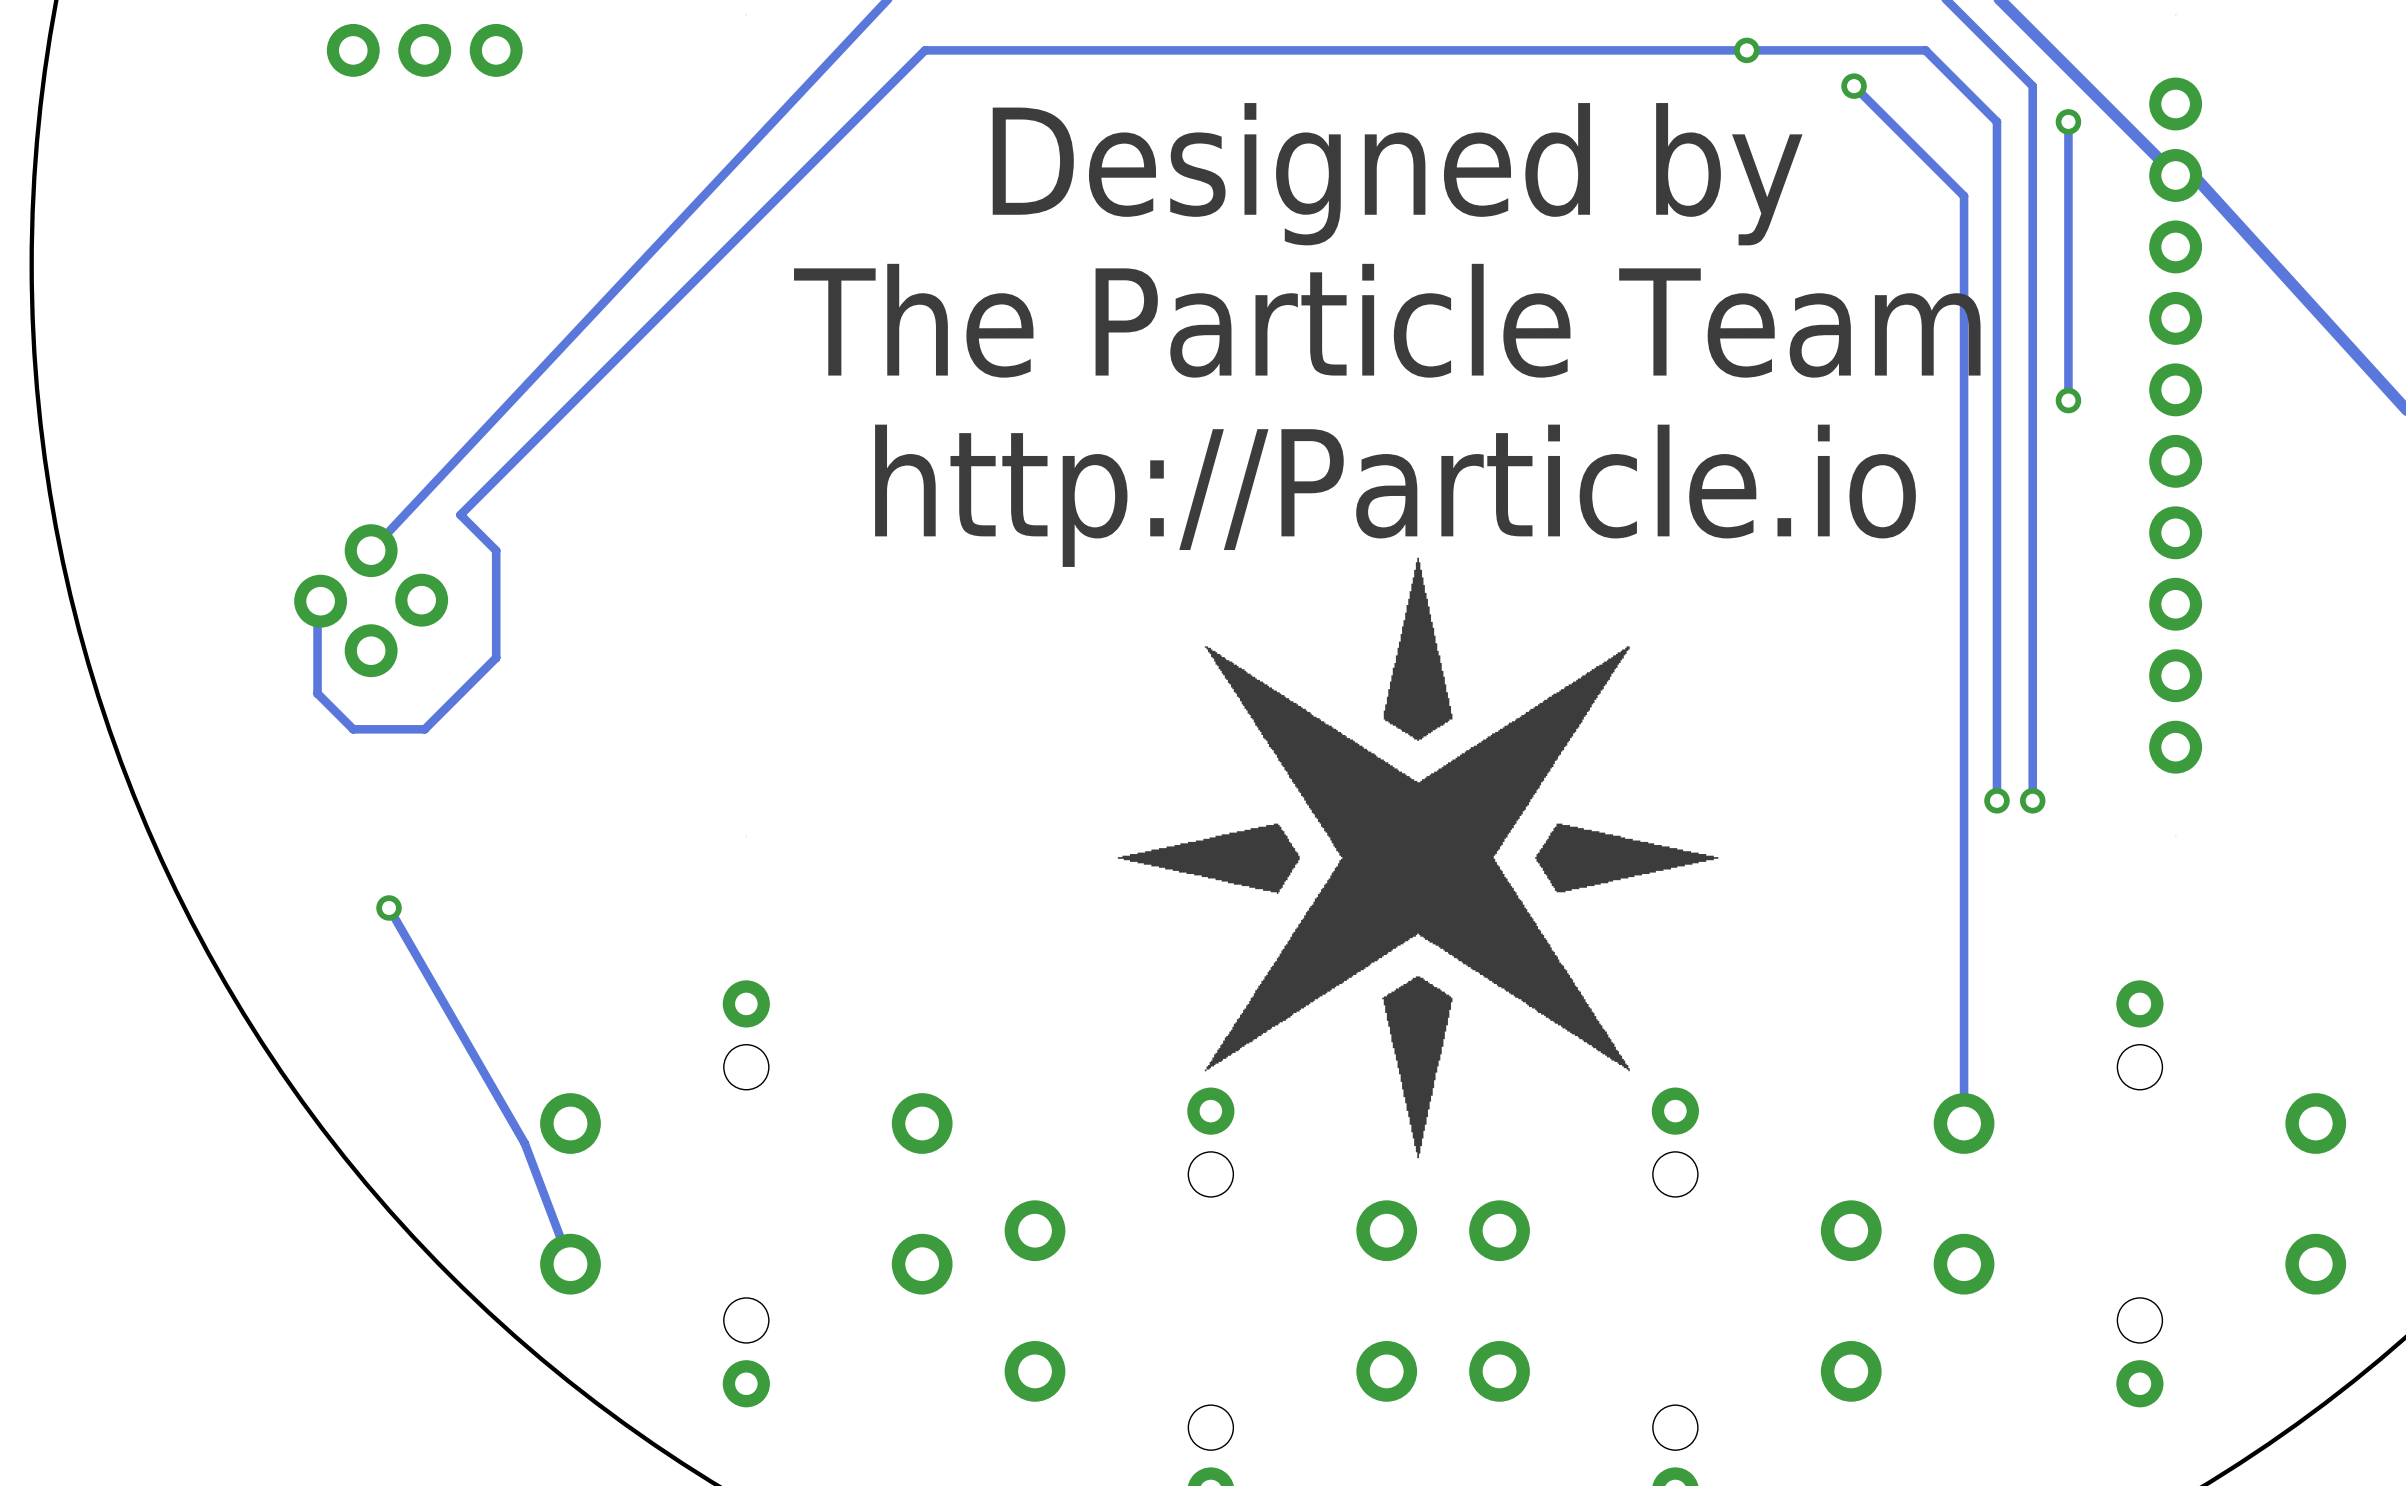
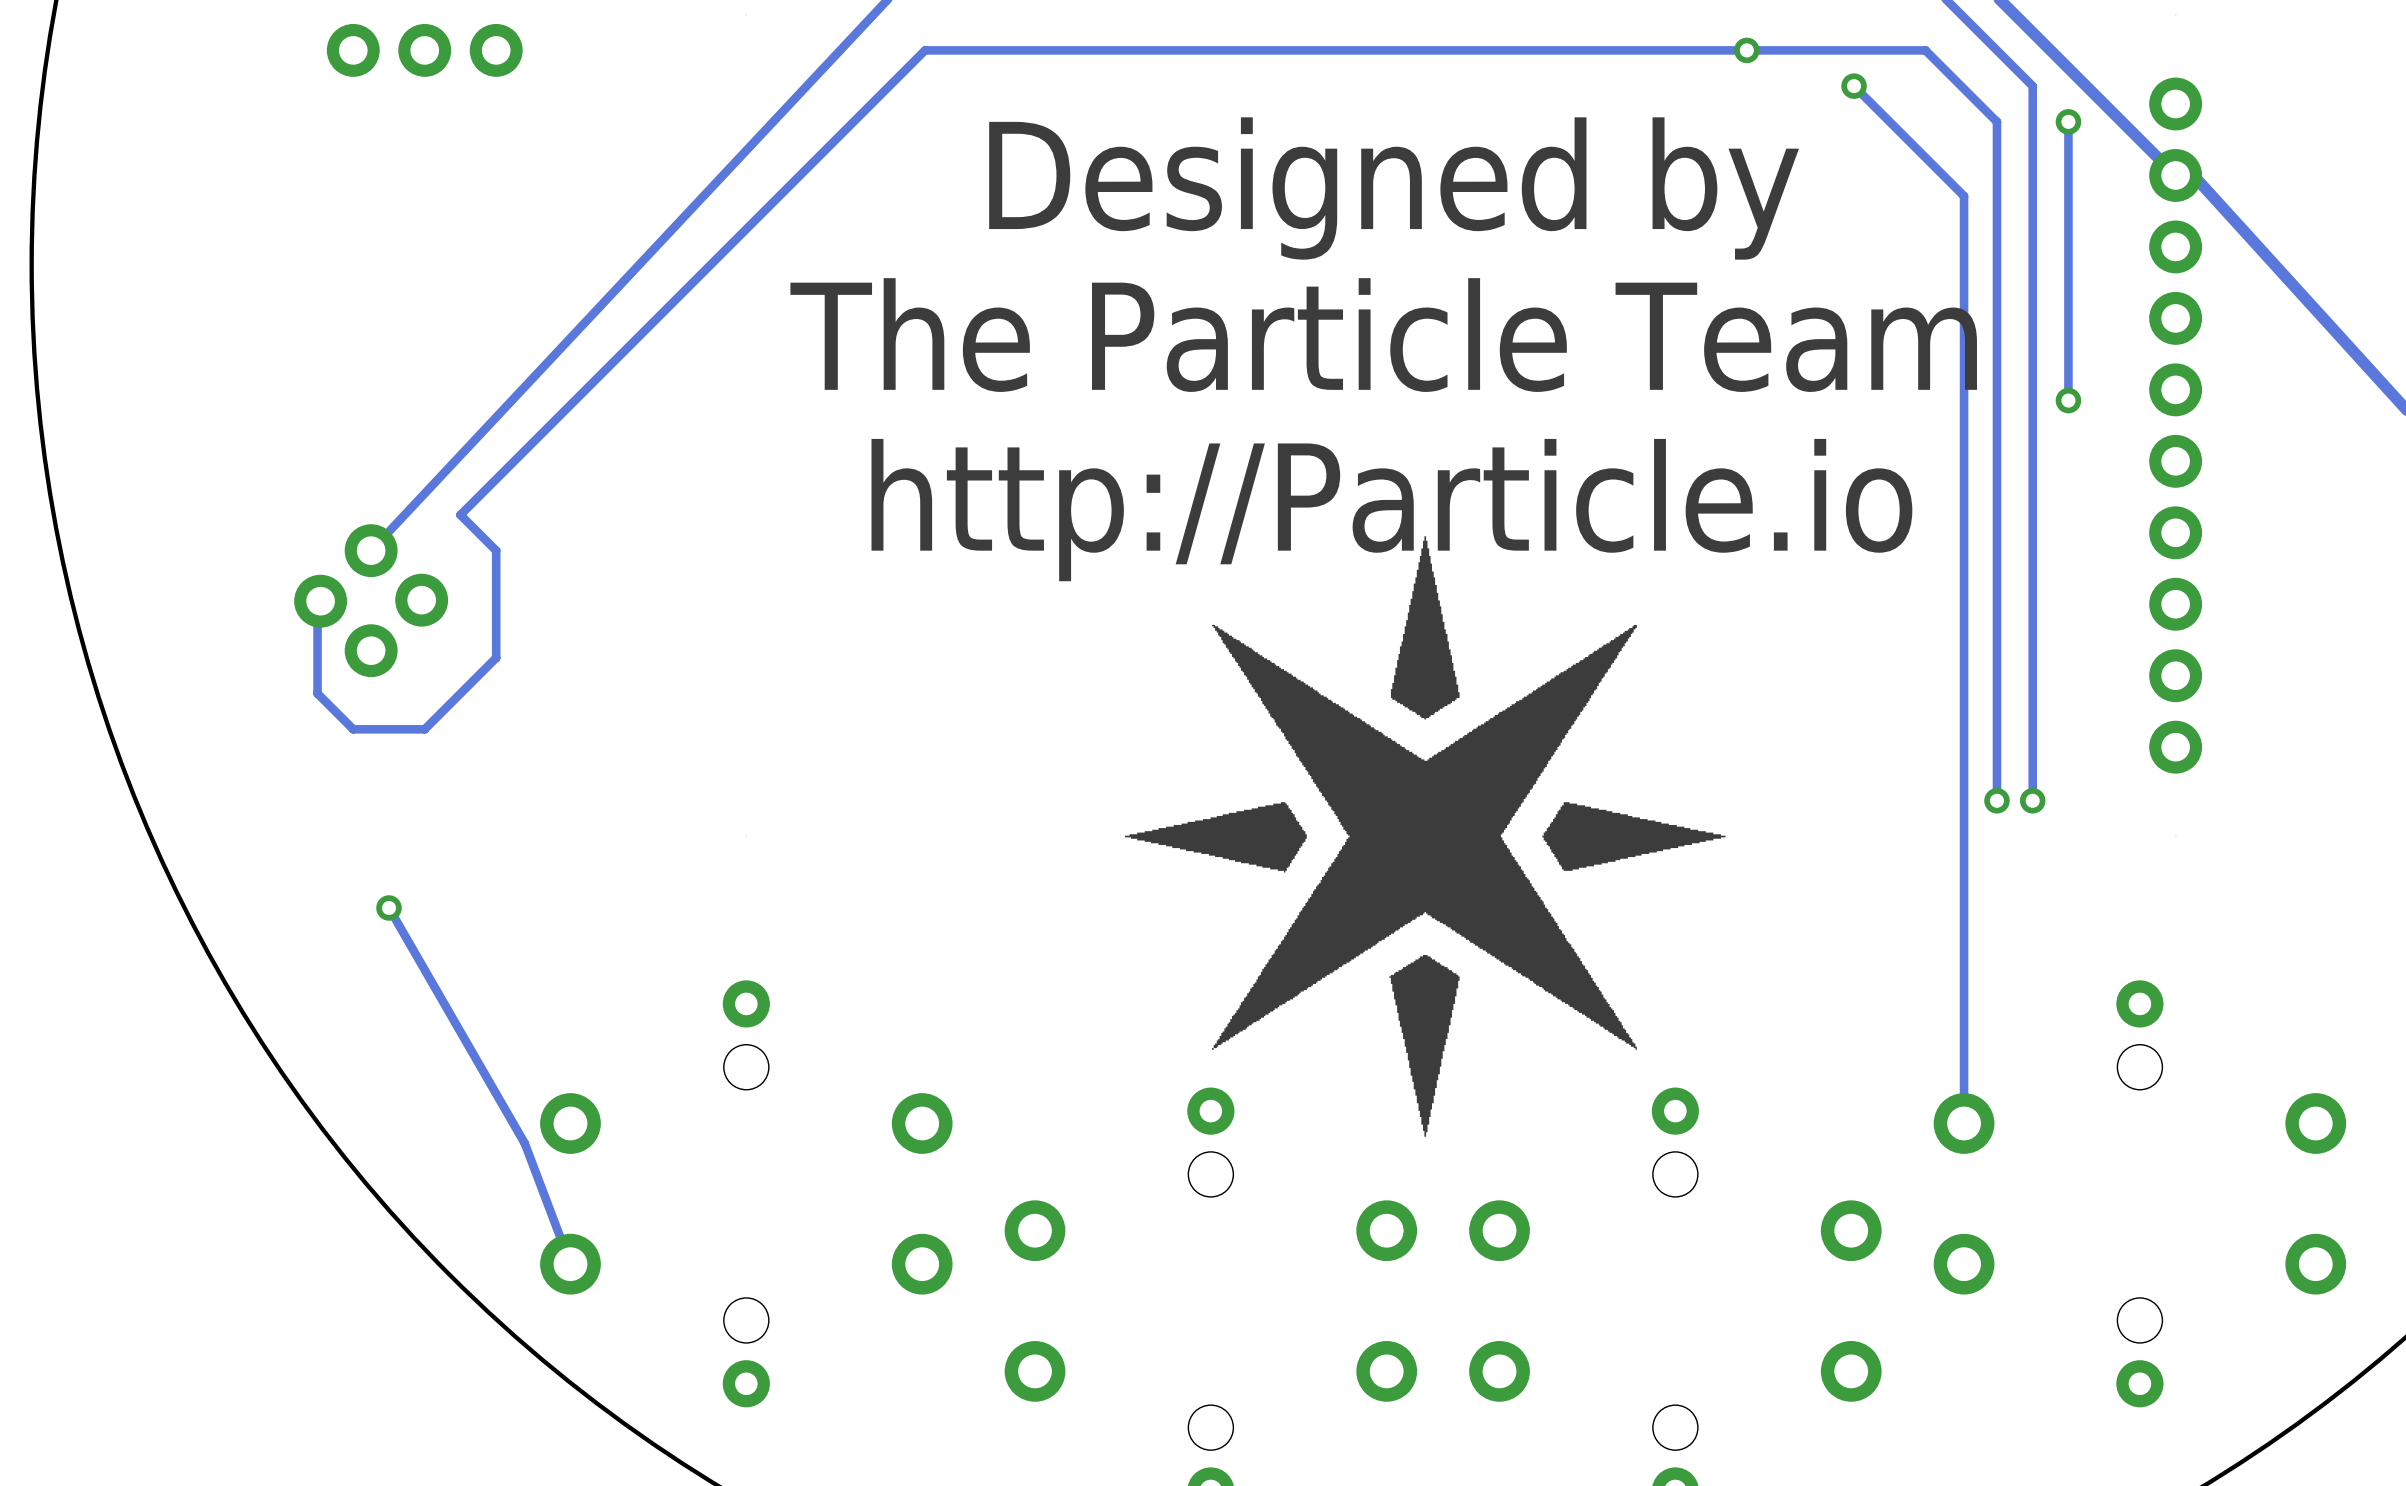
text position: Designed by (1397, 174) -> Designed by (1394, 188)
text position: The Particle Team (1387, 320) -> The Particle Team (1383, 335)
text position: http://Particle.io (1395, 495) -> http://Particle.io (1391, 510)
drawing position: (1418, 857) -> (1425, 836)

